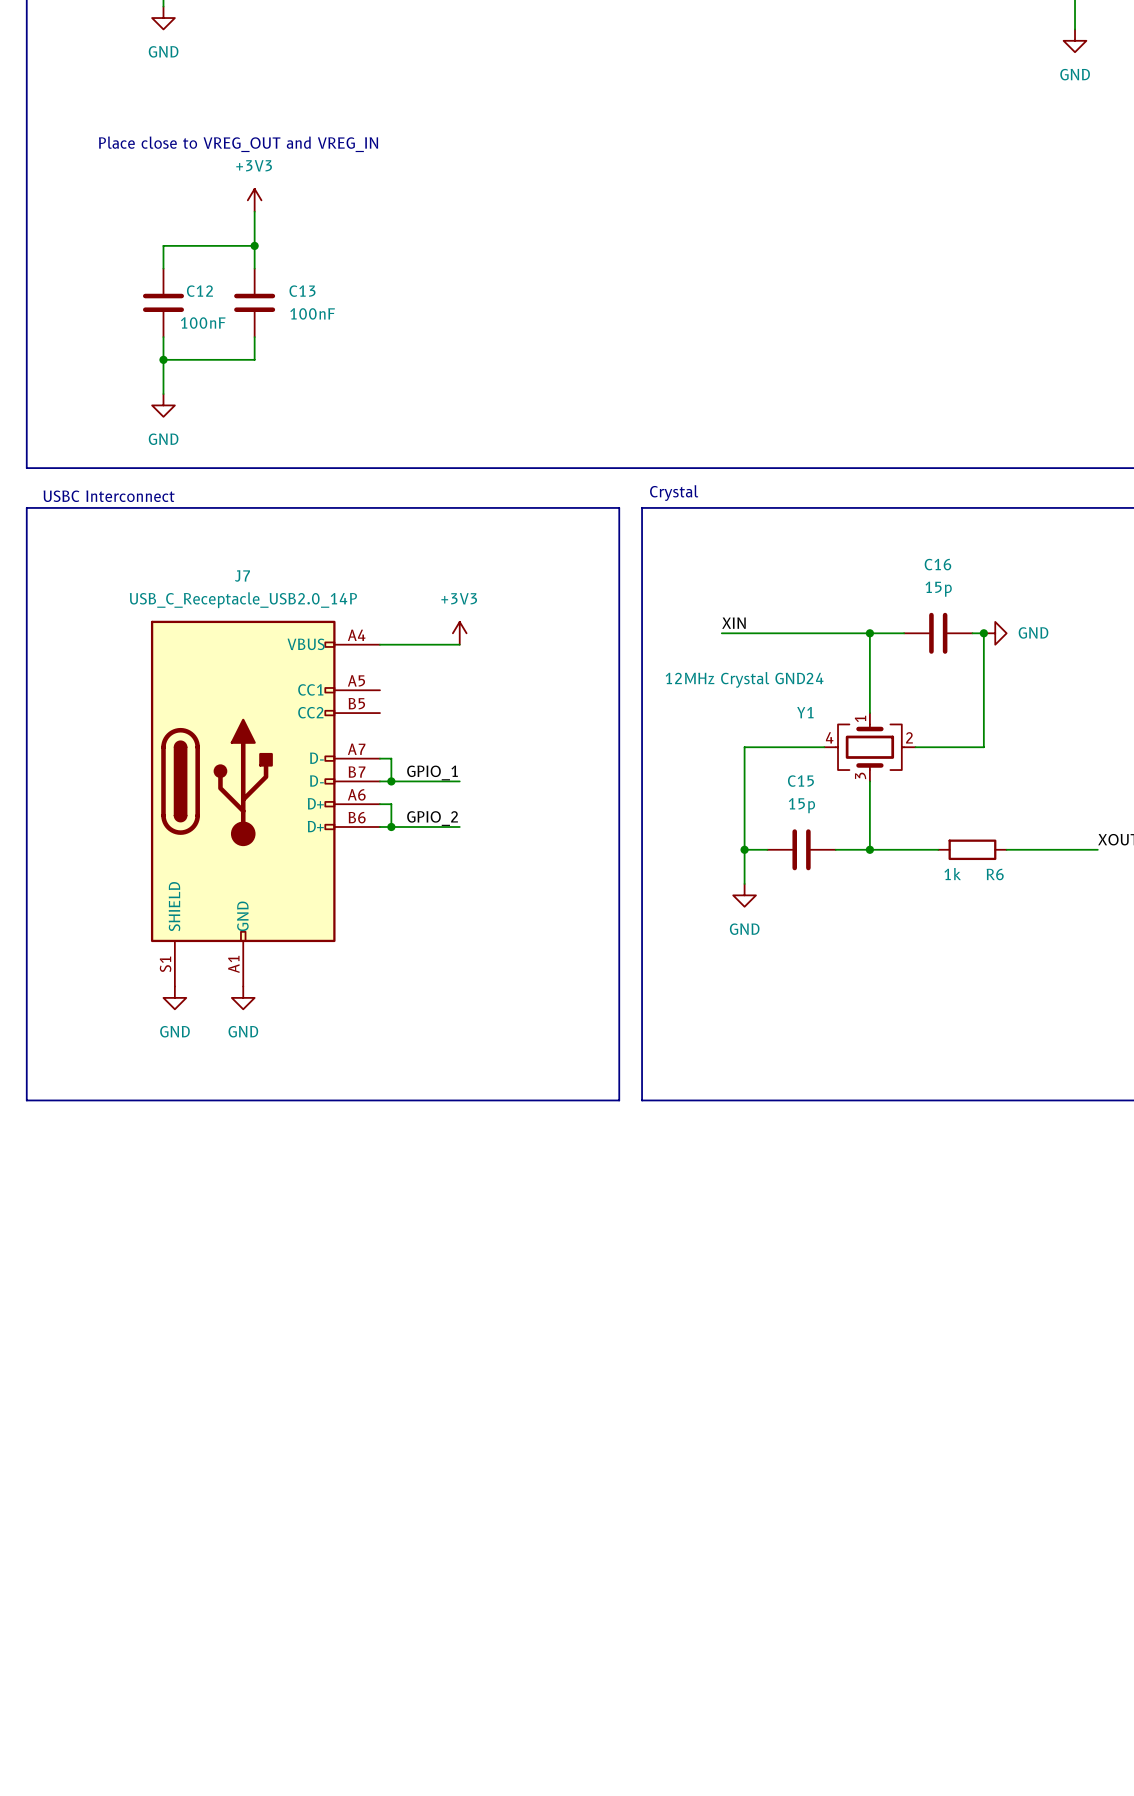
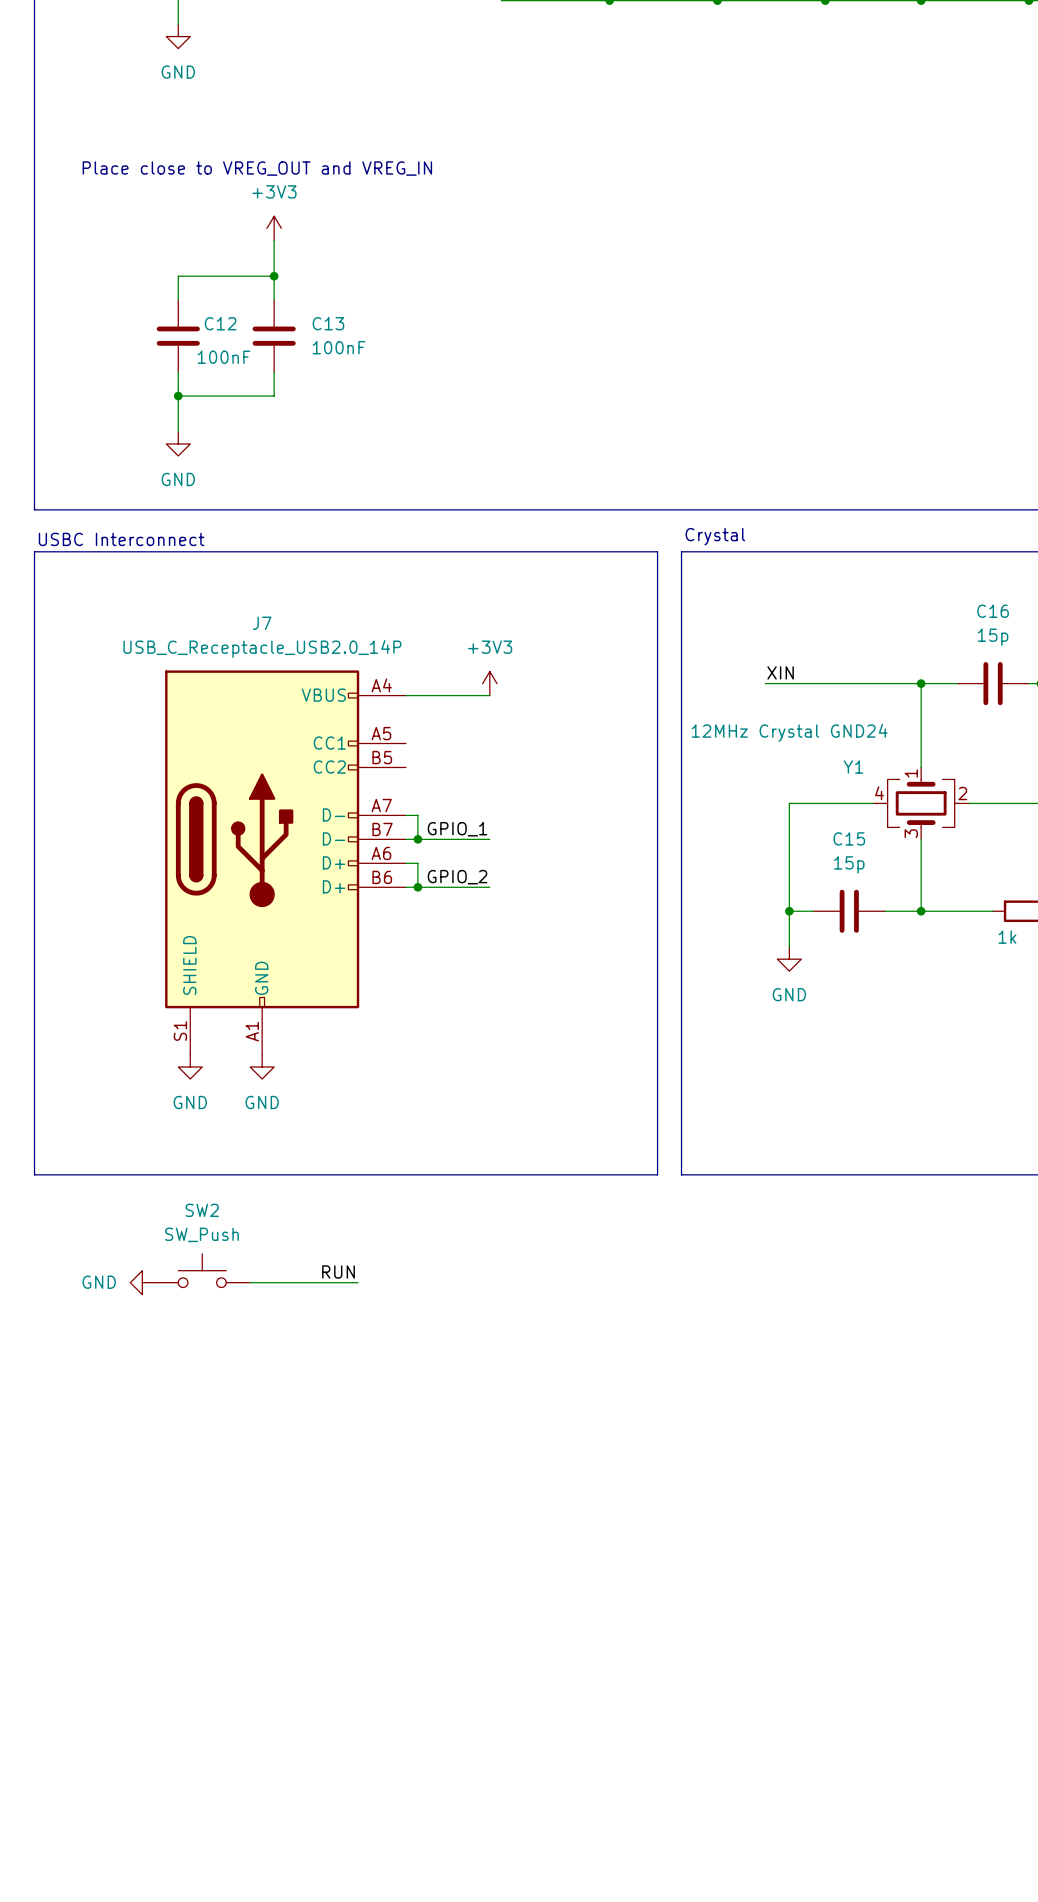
SW2: none -> SW_Push (202, 1270)
label: none -> RUN (338, 1271)
power symbol: none -> GND (142, 1282)
wire: none -> (250, 1282) (358, 1282)

